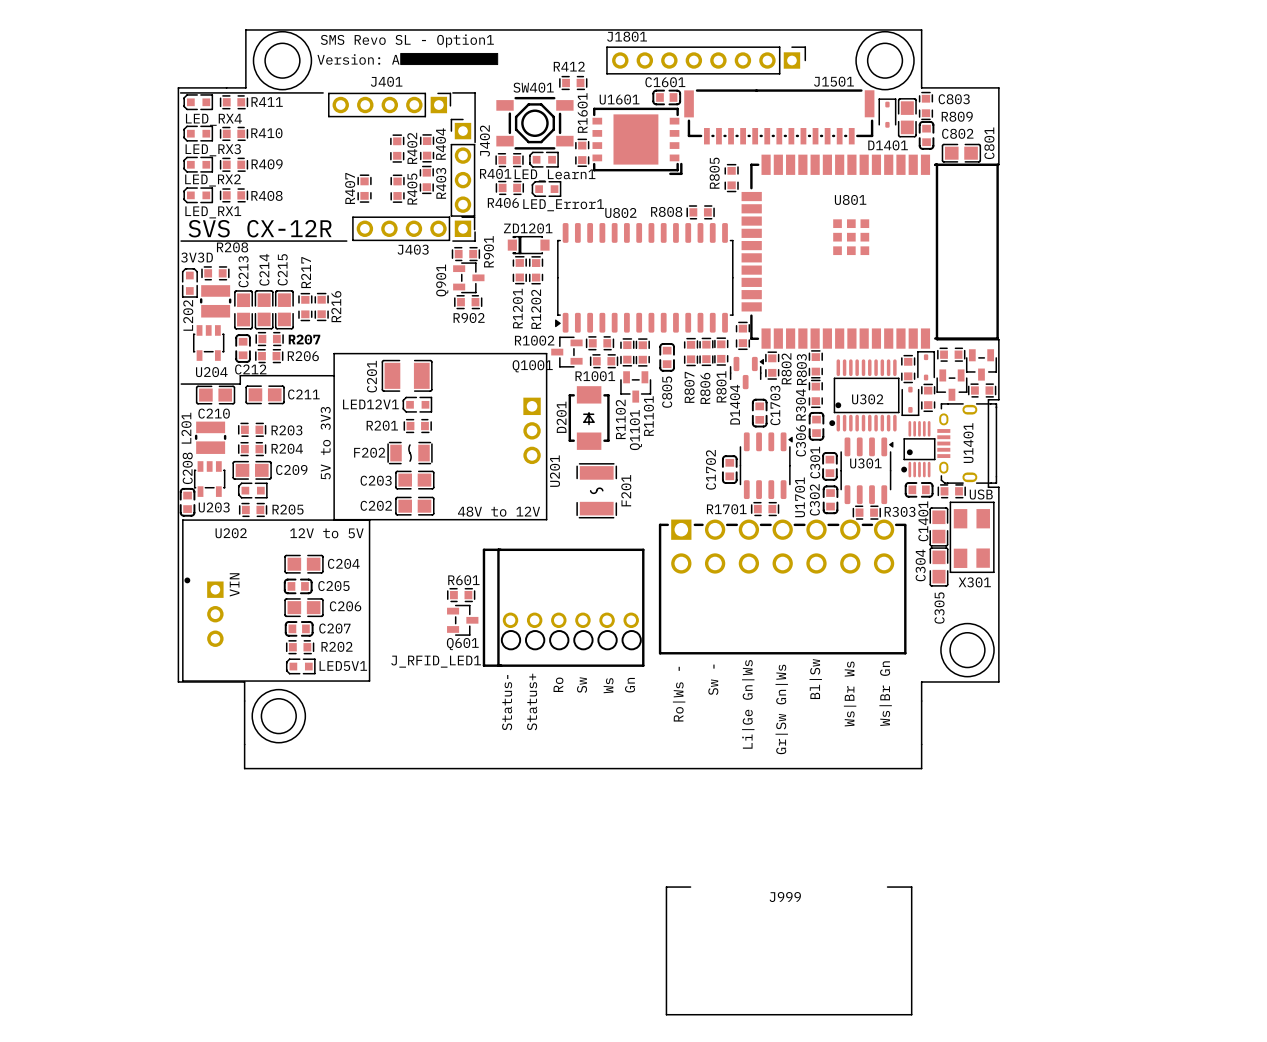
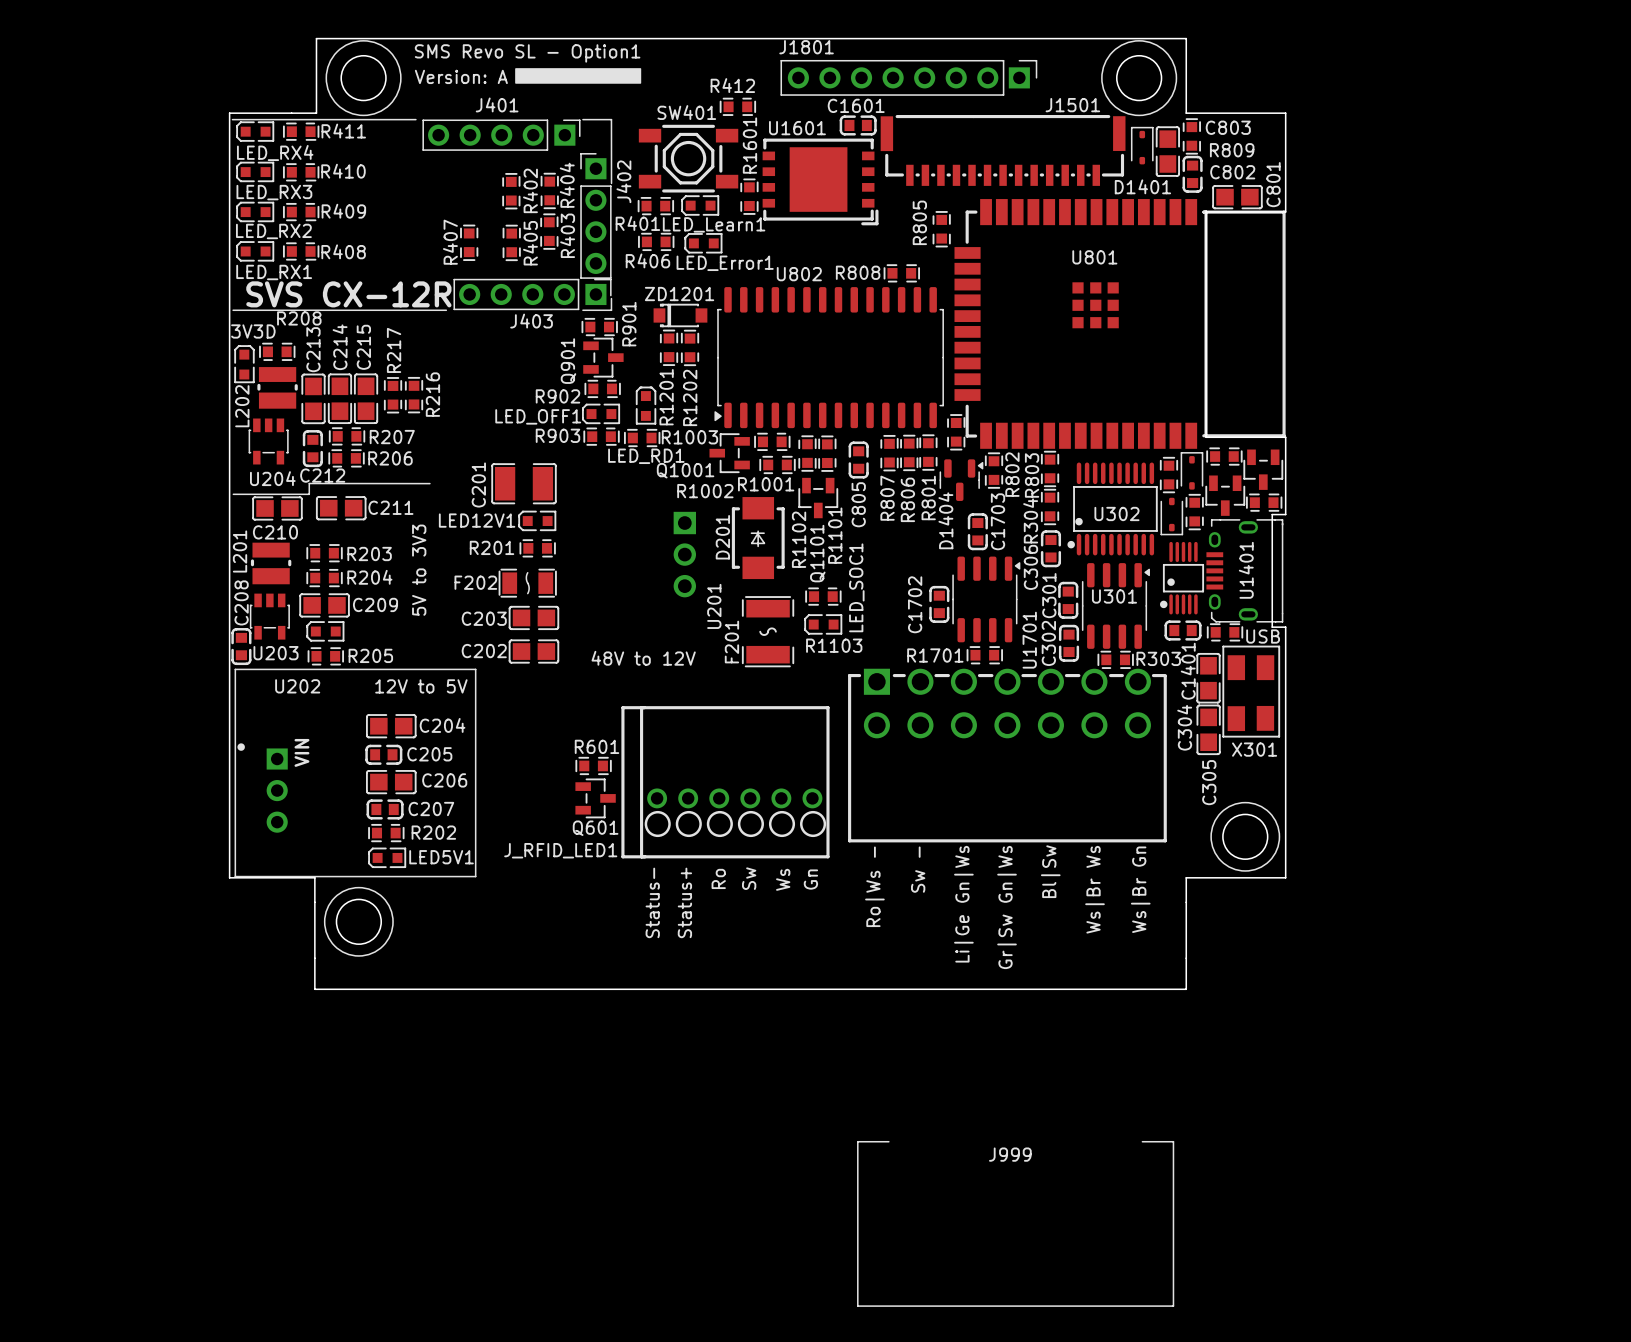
LED_RD1: none -> (646, 405)
R902 name position: R902 (469, 318) -> R902 (557, 396)
LED_OFF1: none -> (601, 413)
R903: none -> (601, 436)
R1003: none -> (642, 438)
R1002 name position: R1002 (534, 340) -> R1002 (705, 491)
line: (334, 353) (546, 353) (546, 519) (334, 519) (334, 353) -> none
R1103: none -> (823, 596)
LED_SOC1: none -> (823, 624)
F201 name position: F201 (626, 490) -> F201 (731, 642)

